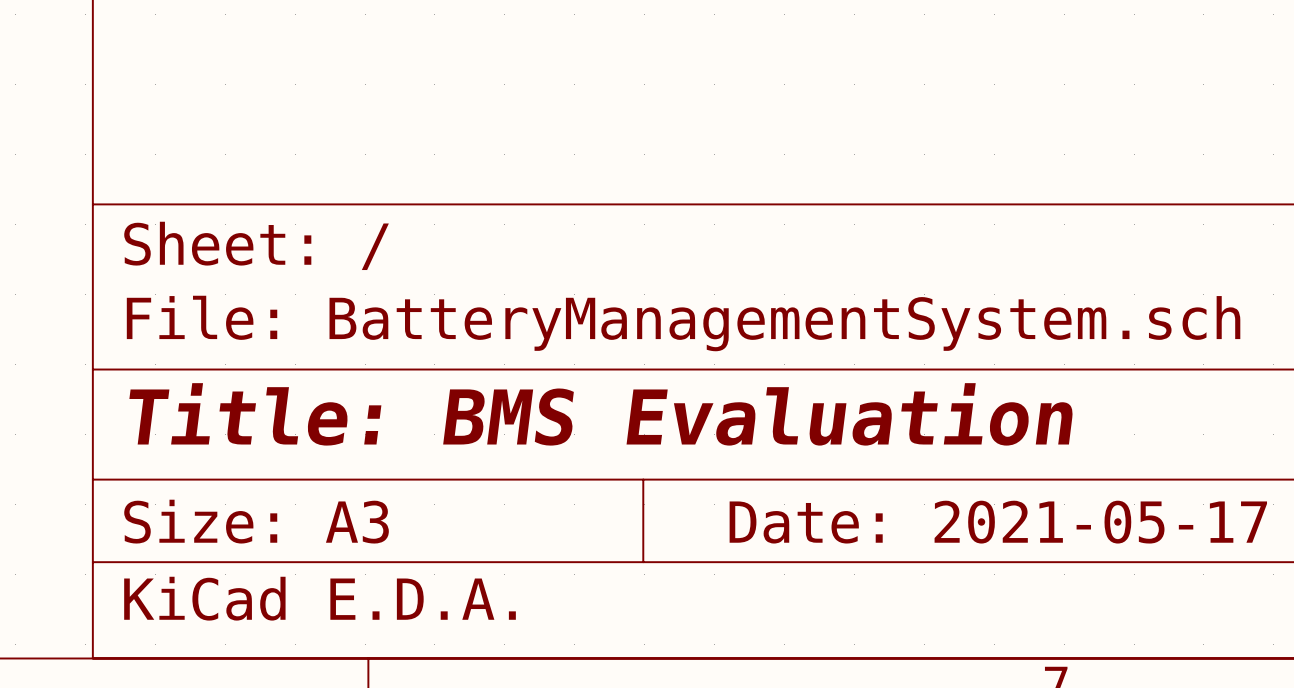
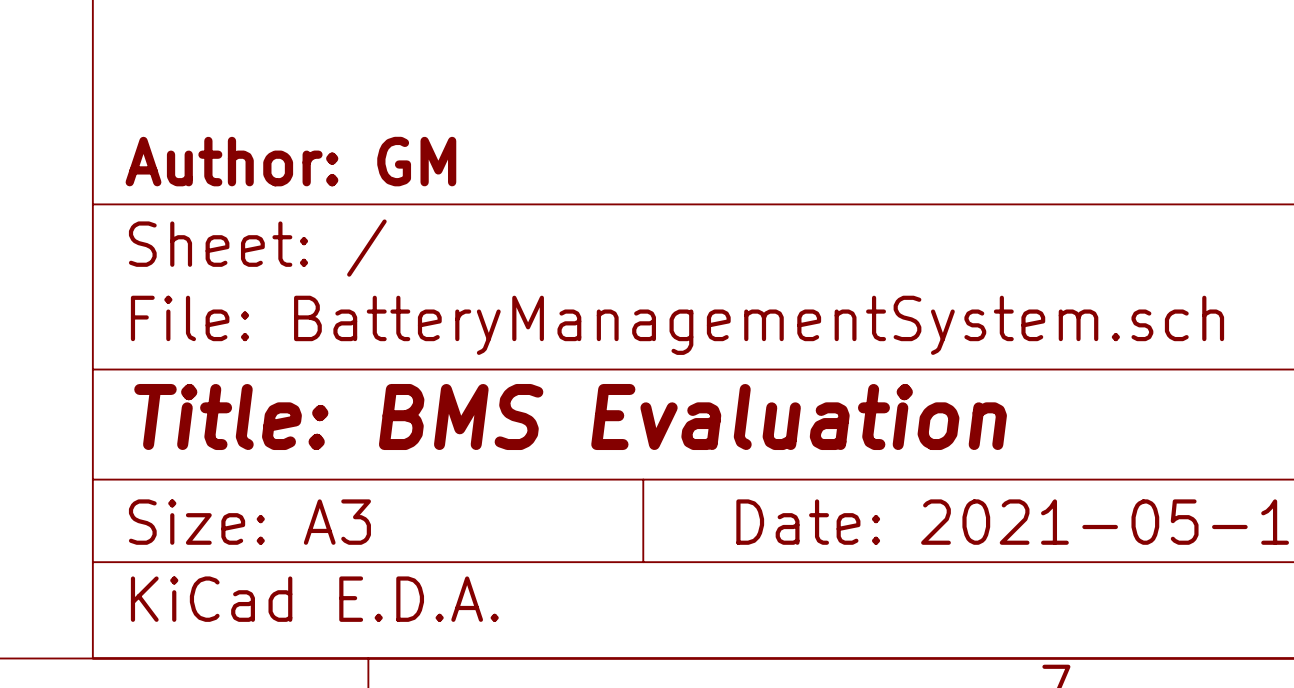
title block: none -> Author: GM (290, 161)

